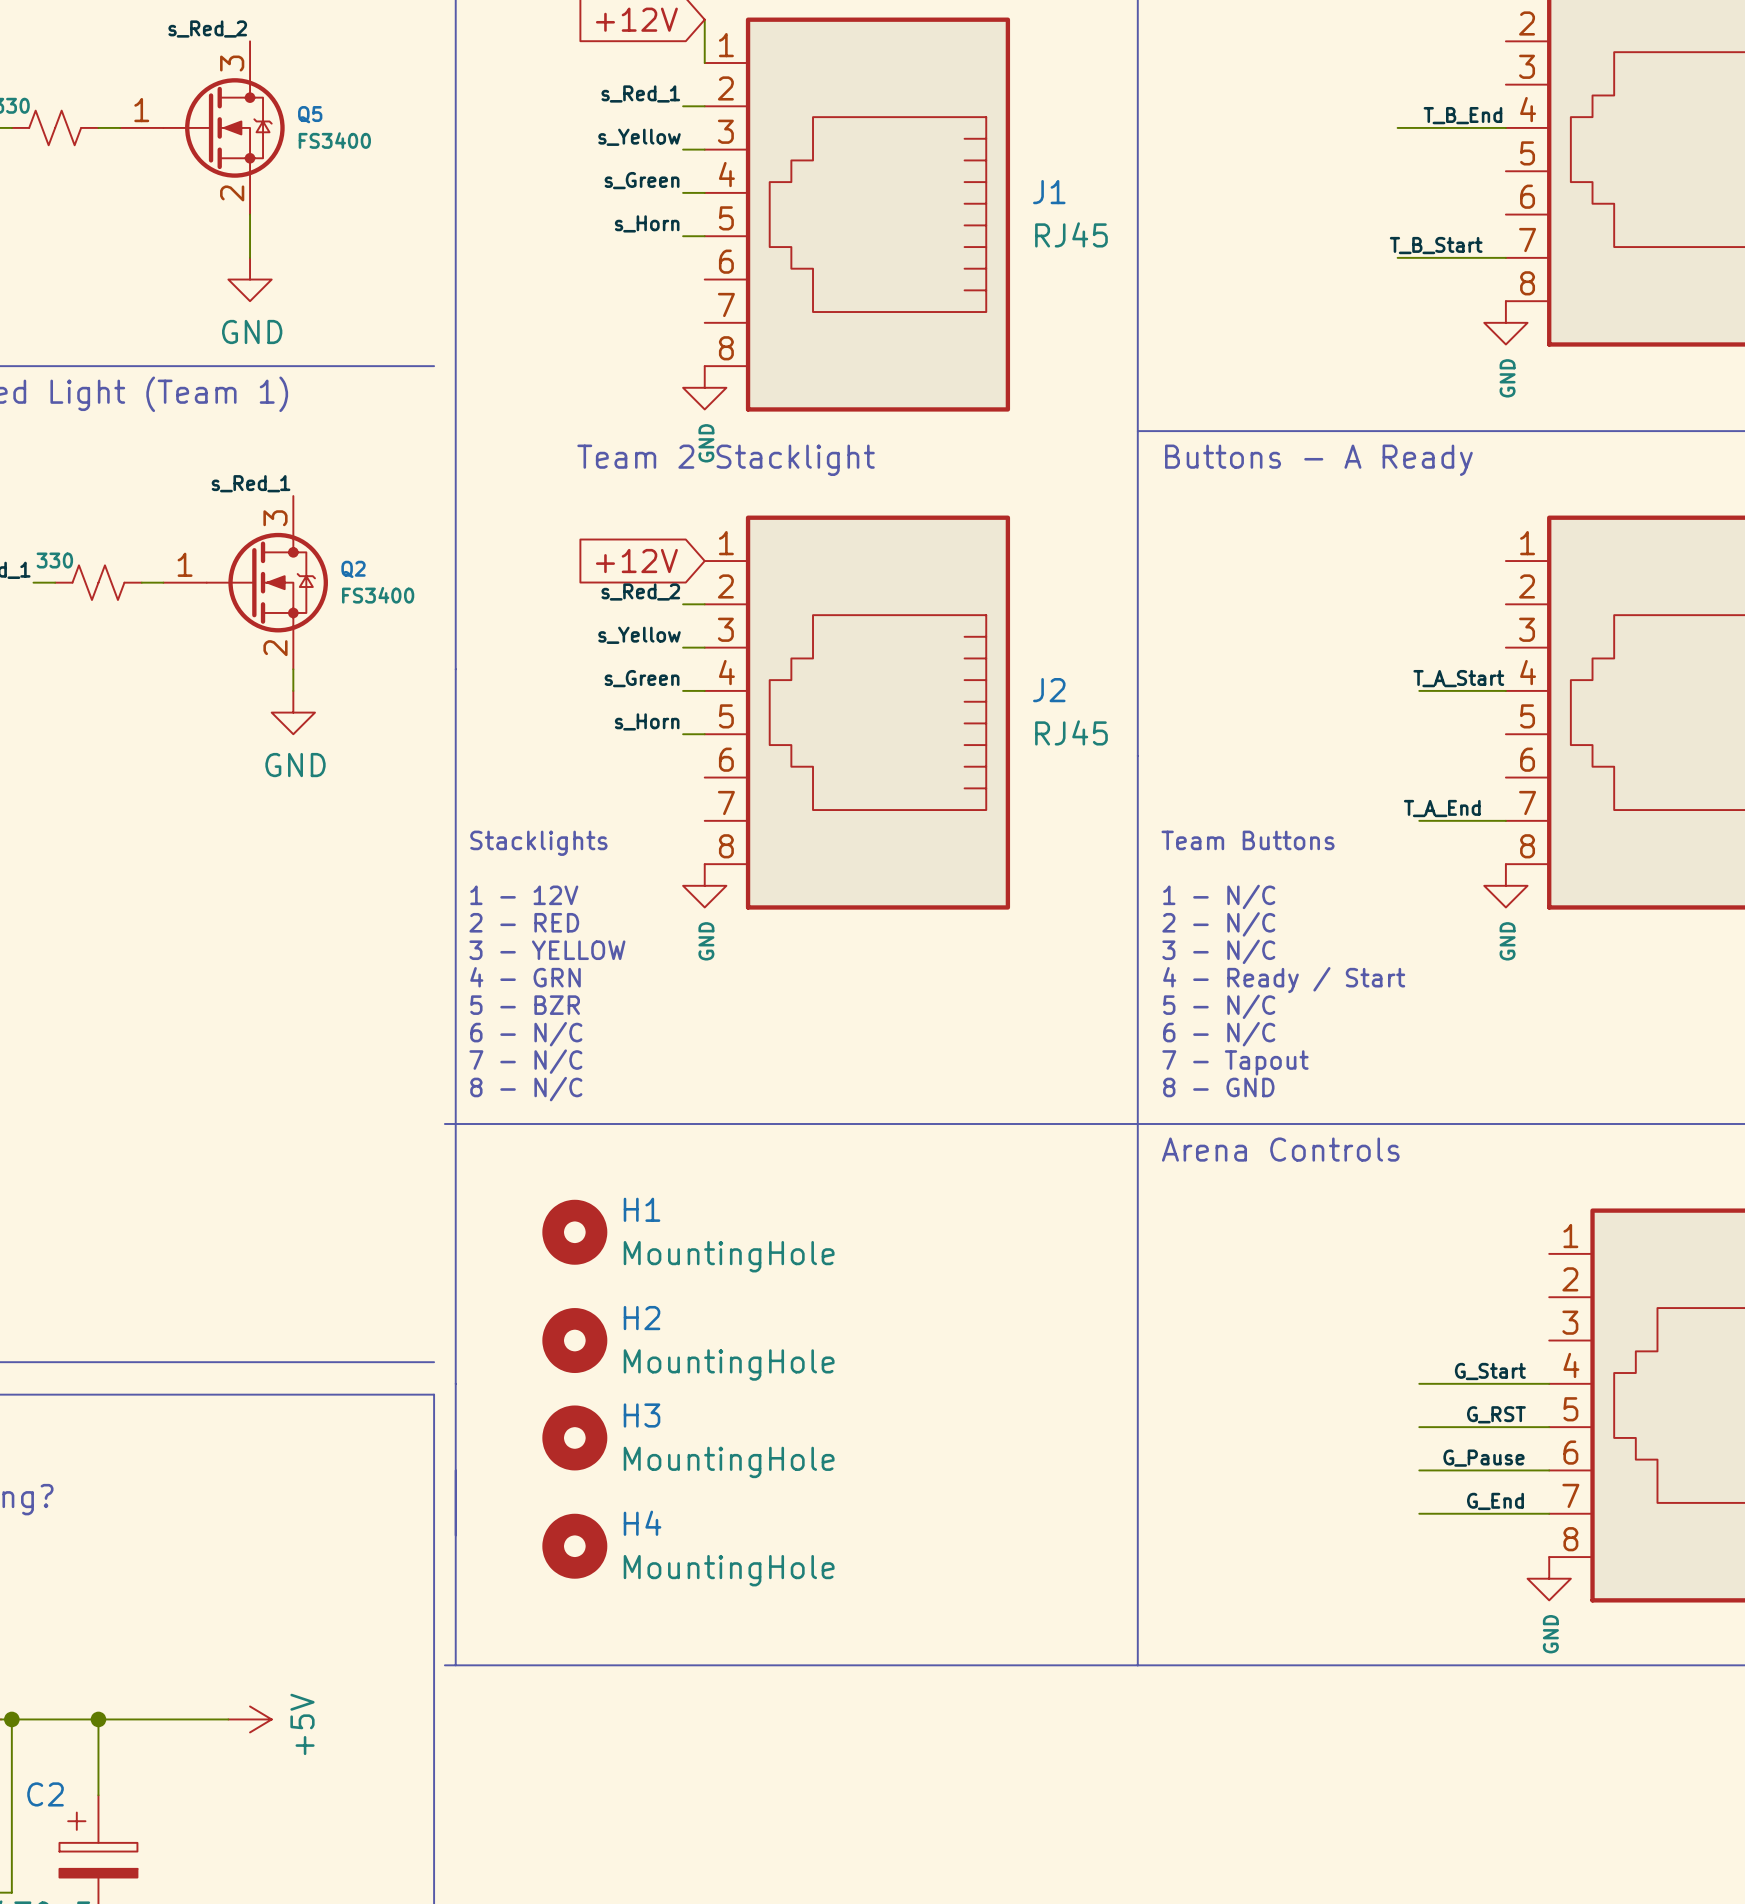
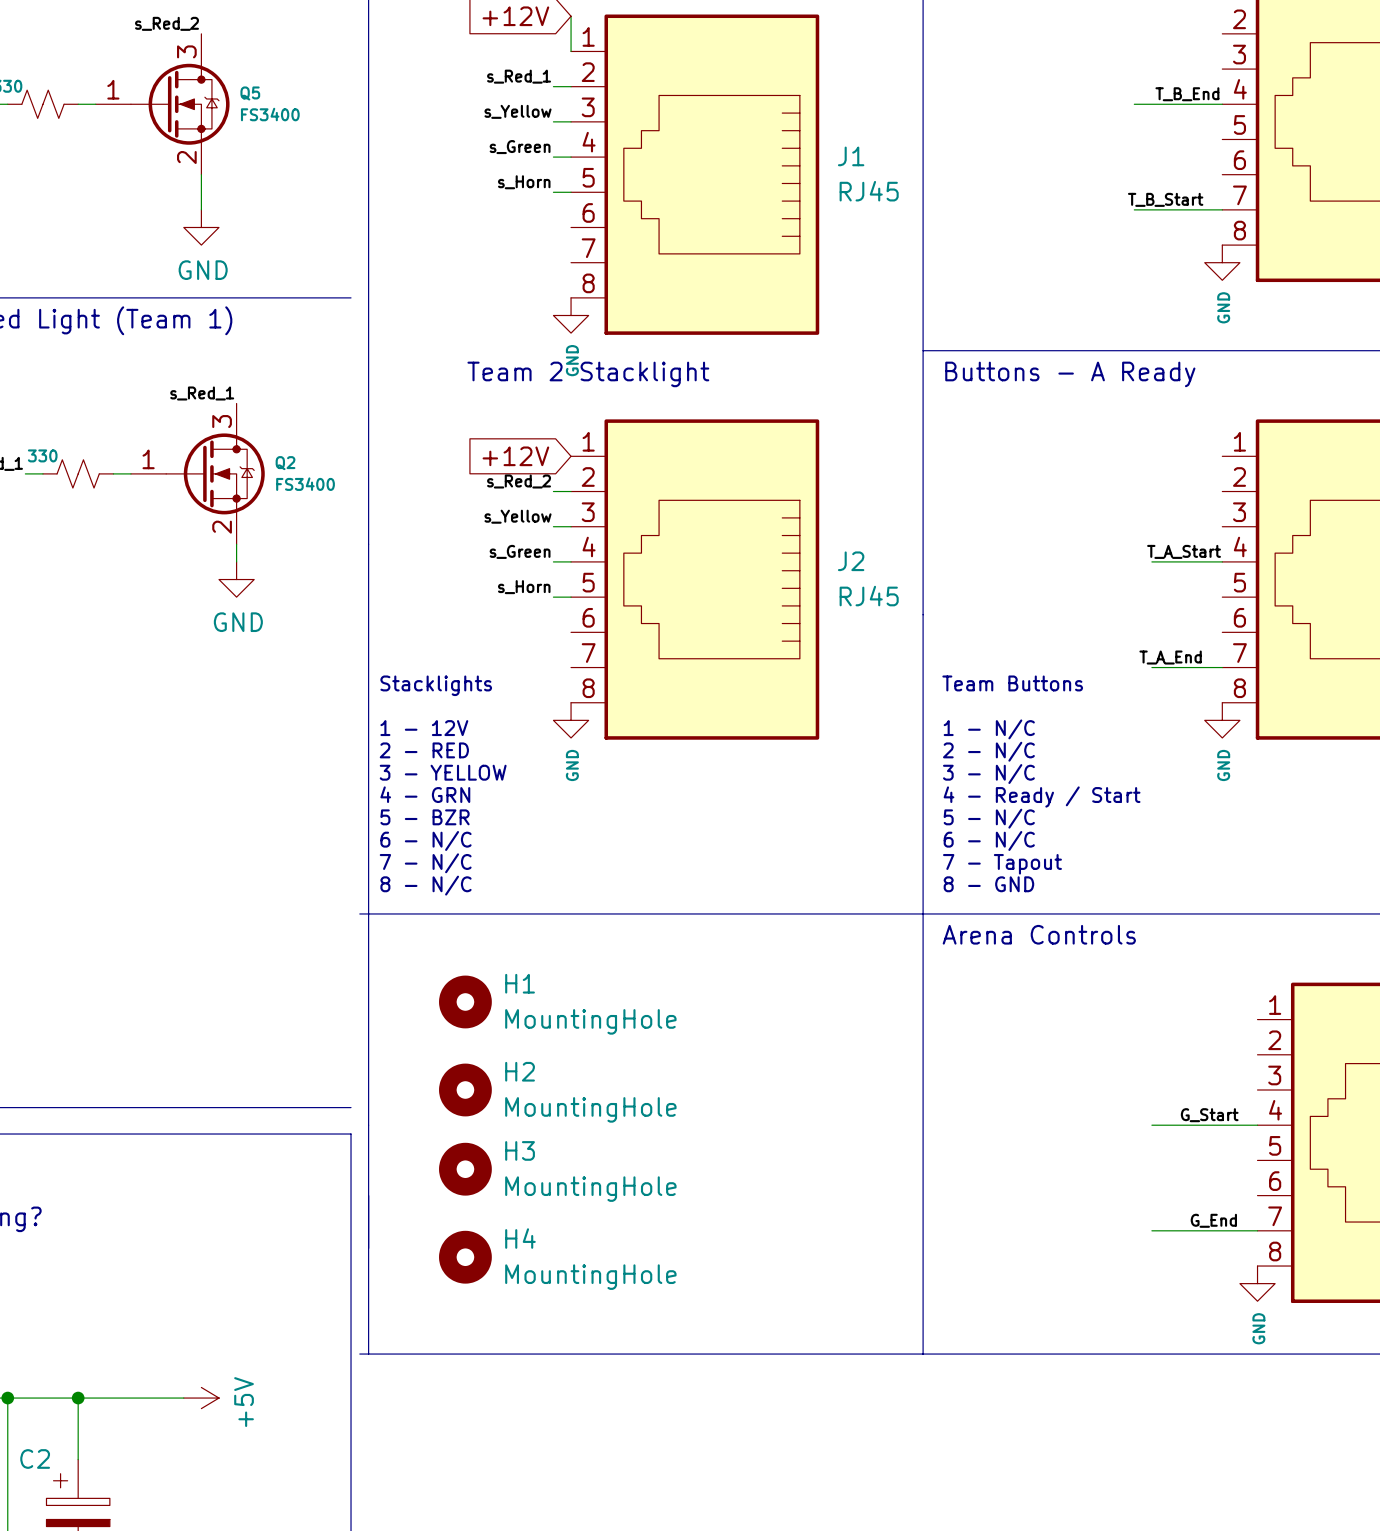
label: G_RST (1496, 1414) -> none
wire: (1419, 1427) (1549, 1427) -> none
label: G_Pause (1483, 1458) -> none
wire: (1419, 1470) (1549, 1470) -> none

